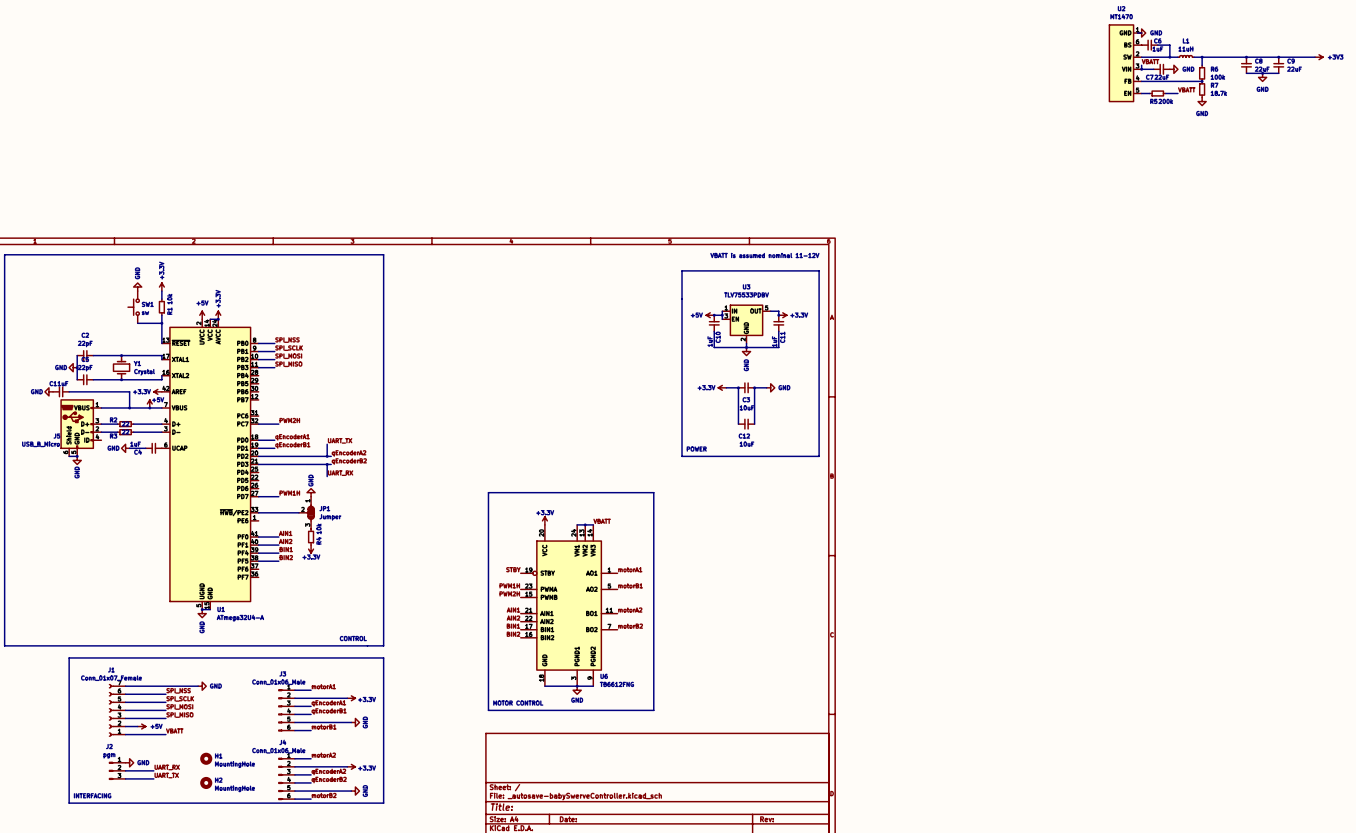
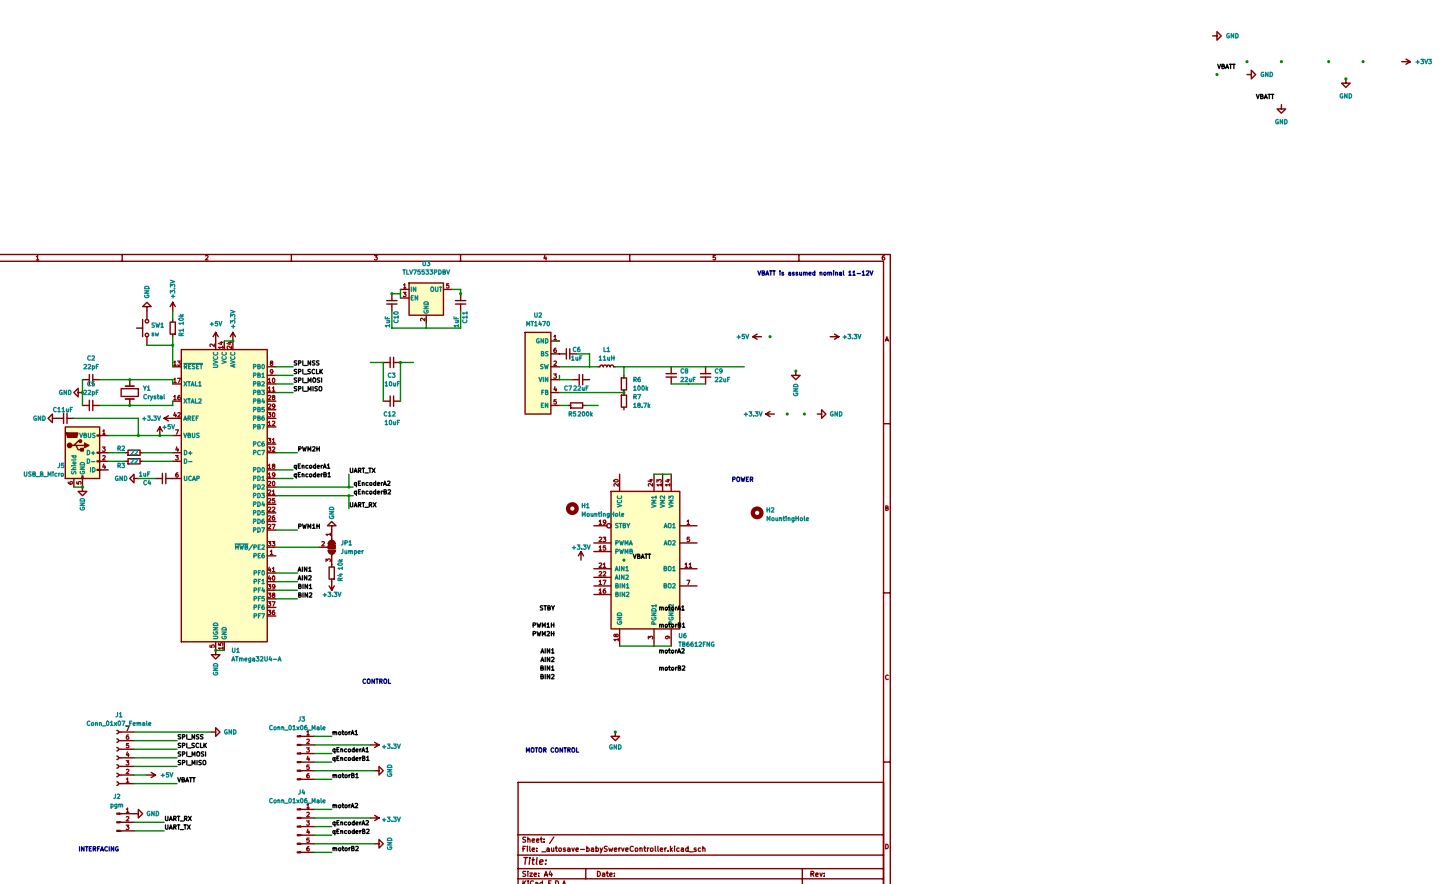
part position: (1149, 45) -> (568, 353)
wire: (1157, 45) (1169, 45) (1169, 57) -> none
part position: (1186, 56) -> (606, 365)
wire: (1141, 57) (1177, 57) -> none
wire: (1194, 57) (1315, 57) -> none
wire: (1202, 57) (1202, 65) -> none
part position: (1125, 63) -> (542, 373)
wire: (1141, 65) (1141, 69) (1153, 69) -> none
part position: (1246, 65) -> (671, 375)
part position: (1278, 65) -> (705, 375)
part position: (1161, 69) -> (580, 379)
part position: (1202, 73) -> (623, 383)
wire: (1246, 73) (1278, 73) -> none
wire: (1141, 81) (1202, 81) -> none
junction: (1202, 81) -> none
part position: (1202, 89) -> (623, 401)
wire: (1141, 93) (1149, 93) -> none
part position: (1157, 93) -> (576, 405)
wire: (1165, 93) (1177, 93) -> none
line: (4, 254) (4, 645) (383, 645) (383, 254) (4, 254) -> none
wire: none -> (400, 289) (400, 298)
wire: none -> (452, 289) (460, 289) (460, 293)
line: (682, 270) (819, 270) (819, 456) (682, 456) (682, 270) -> none
wire: none -> (391, 293) (400, 293)
junction: none -> (391, 293)
junction: none -> (460, 293)
wire: none -> (391, 310) (391, 328) (460, 328) (460, 310)
wire: none -> (426, 323) (426, 328)
wire: (722, 311) (722, 319) -> none
wire: (770, 311) (778, 311) (778, 315) -> none
wire: (714, 315) (722, 315) -> none
junction: (714, 315) -> none
junction: (778, 315) -> none
wire: none -> (555, 340) (559, 340)
part position: (714, 323) -> (391, 302)
part position: (778, 323) -> (460, 302)
part position: (746, 324) -> (426, 303)
wire: none -> (576, 353) (589, 353) (589, 366)
wire: (714, 331) (714, 347) (778, 347) (778, 331) -> none
wire: none -> (370, 362) (383, 362) (383, 401)
junction: none -> (400, 362)
wire: none -> (413, 362) (400, 362) (400, 401)
wire: none -> (559, 366) (598, 366)
wire: none -> (615, 366) (744, 366)
wire: none -> (623, 366) (623, 375)
wire: (746, 343) (746, 347) -> none
wire: none -> (559, 375) (559, 379) (572, 379)
wire: none -> (671, 383) (705, 383)
wire: none -> (559, 392) (623, 392)
junction: none -> (623, 392)
wire: none -> (559, 405) (568, 405)
wire: none -> (585, 405) (598, 405)
wire: (726, 387) (738, 387) (738, 424) -> none
part position: (746, 387) -> (391, 362)
wire: (766, 387) (754, 387) (754, 424) -> none
part position: (746, 424) -> (391, 401)
wire: none -> (654, 474) (671, 474)
line: (488, 492) (653, 492) (653, 710) (488, 710) (488, 492) -> none
part position: (569, 605) -> (645, 560)
wire: none -> (619, 646) (671, 646)
line: (69, 657) (69, 803) (383, 803) (383, 657) (69, 657) -> none
wire: (544, 686) (593, 686) -> none
part position: (206, 758) -> (572, 508)
part position: (206, 782) -> (757, 512)

